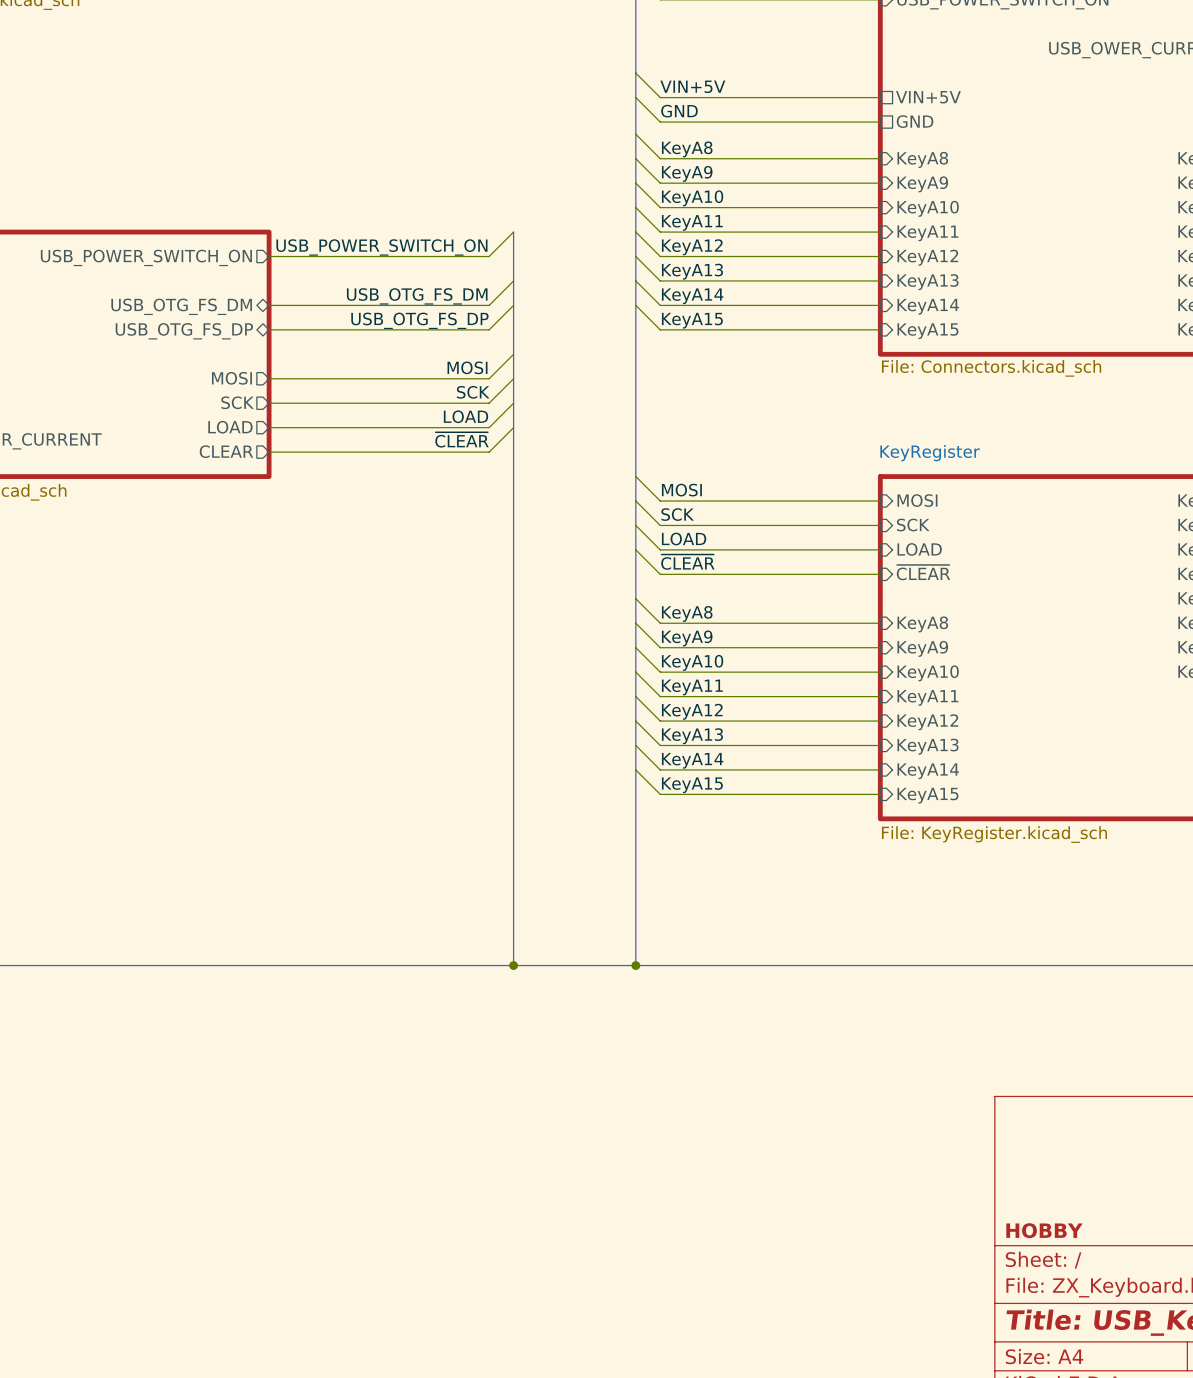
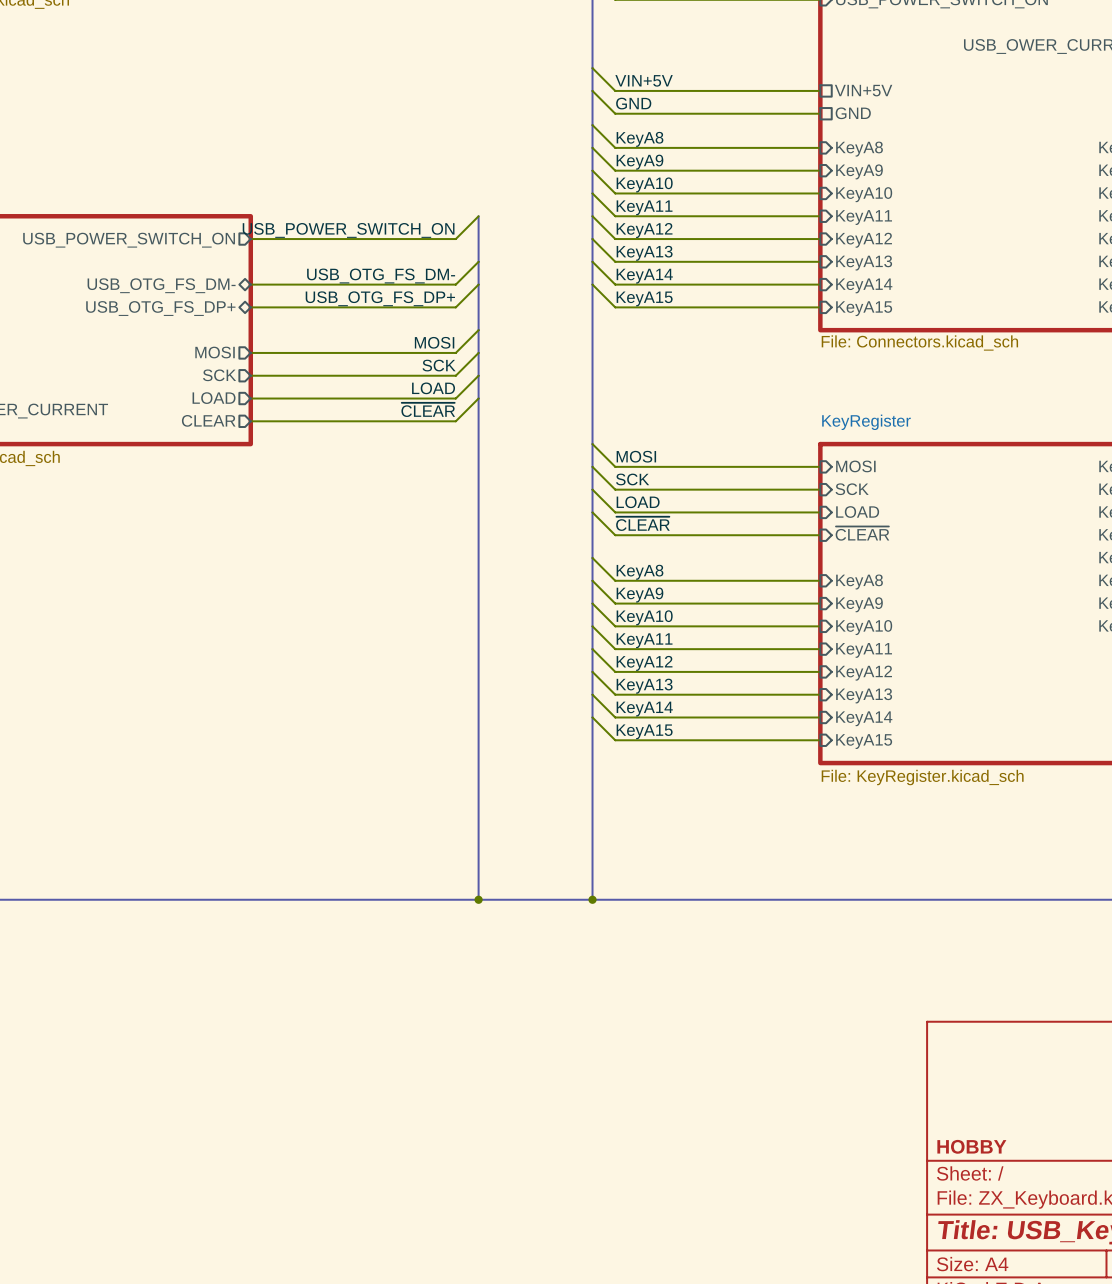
label: USB_OTG_FS_DM (417, 296) -> USB_OTG_FS_DM- (381, 276)
sheet pin: USB_OTG_FS_DM (181, 306) -> USB_OTG_FS_DM- (161, 285)
label: USB_OTG_FS_DP (419, 320) -> USB_OTG_FS_DP+ (380, 298)
sheet pin: USB_OTG_FS_DP (184, 331) -> USB_OTG_FS_DP+ (160, 308)

